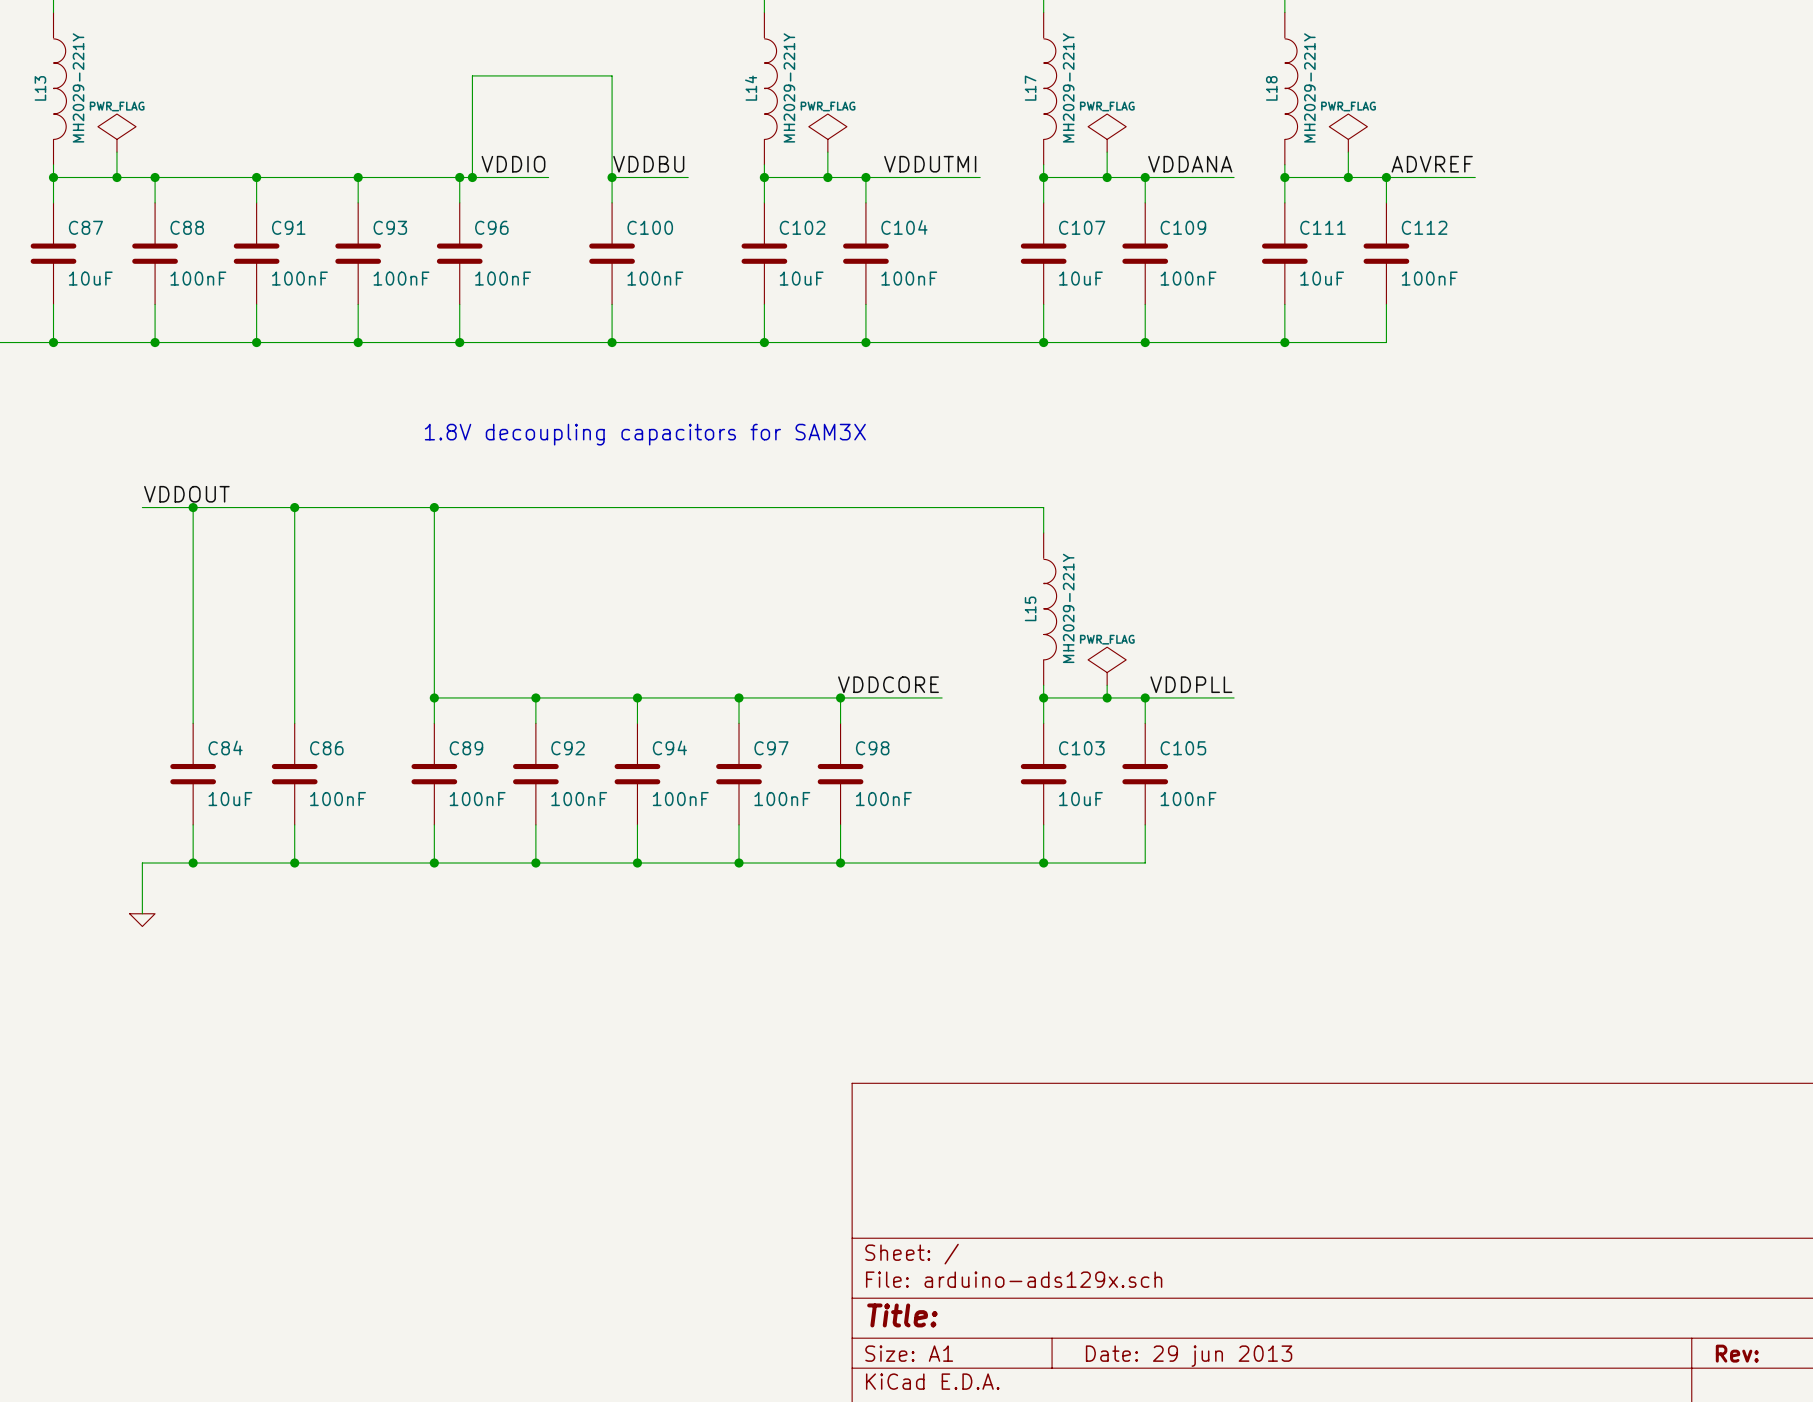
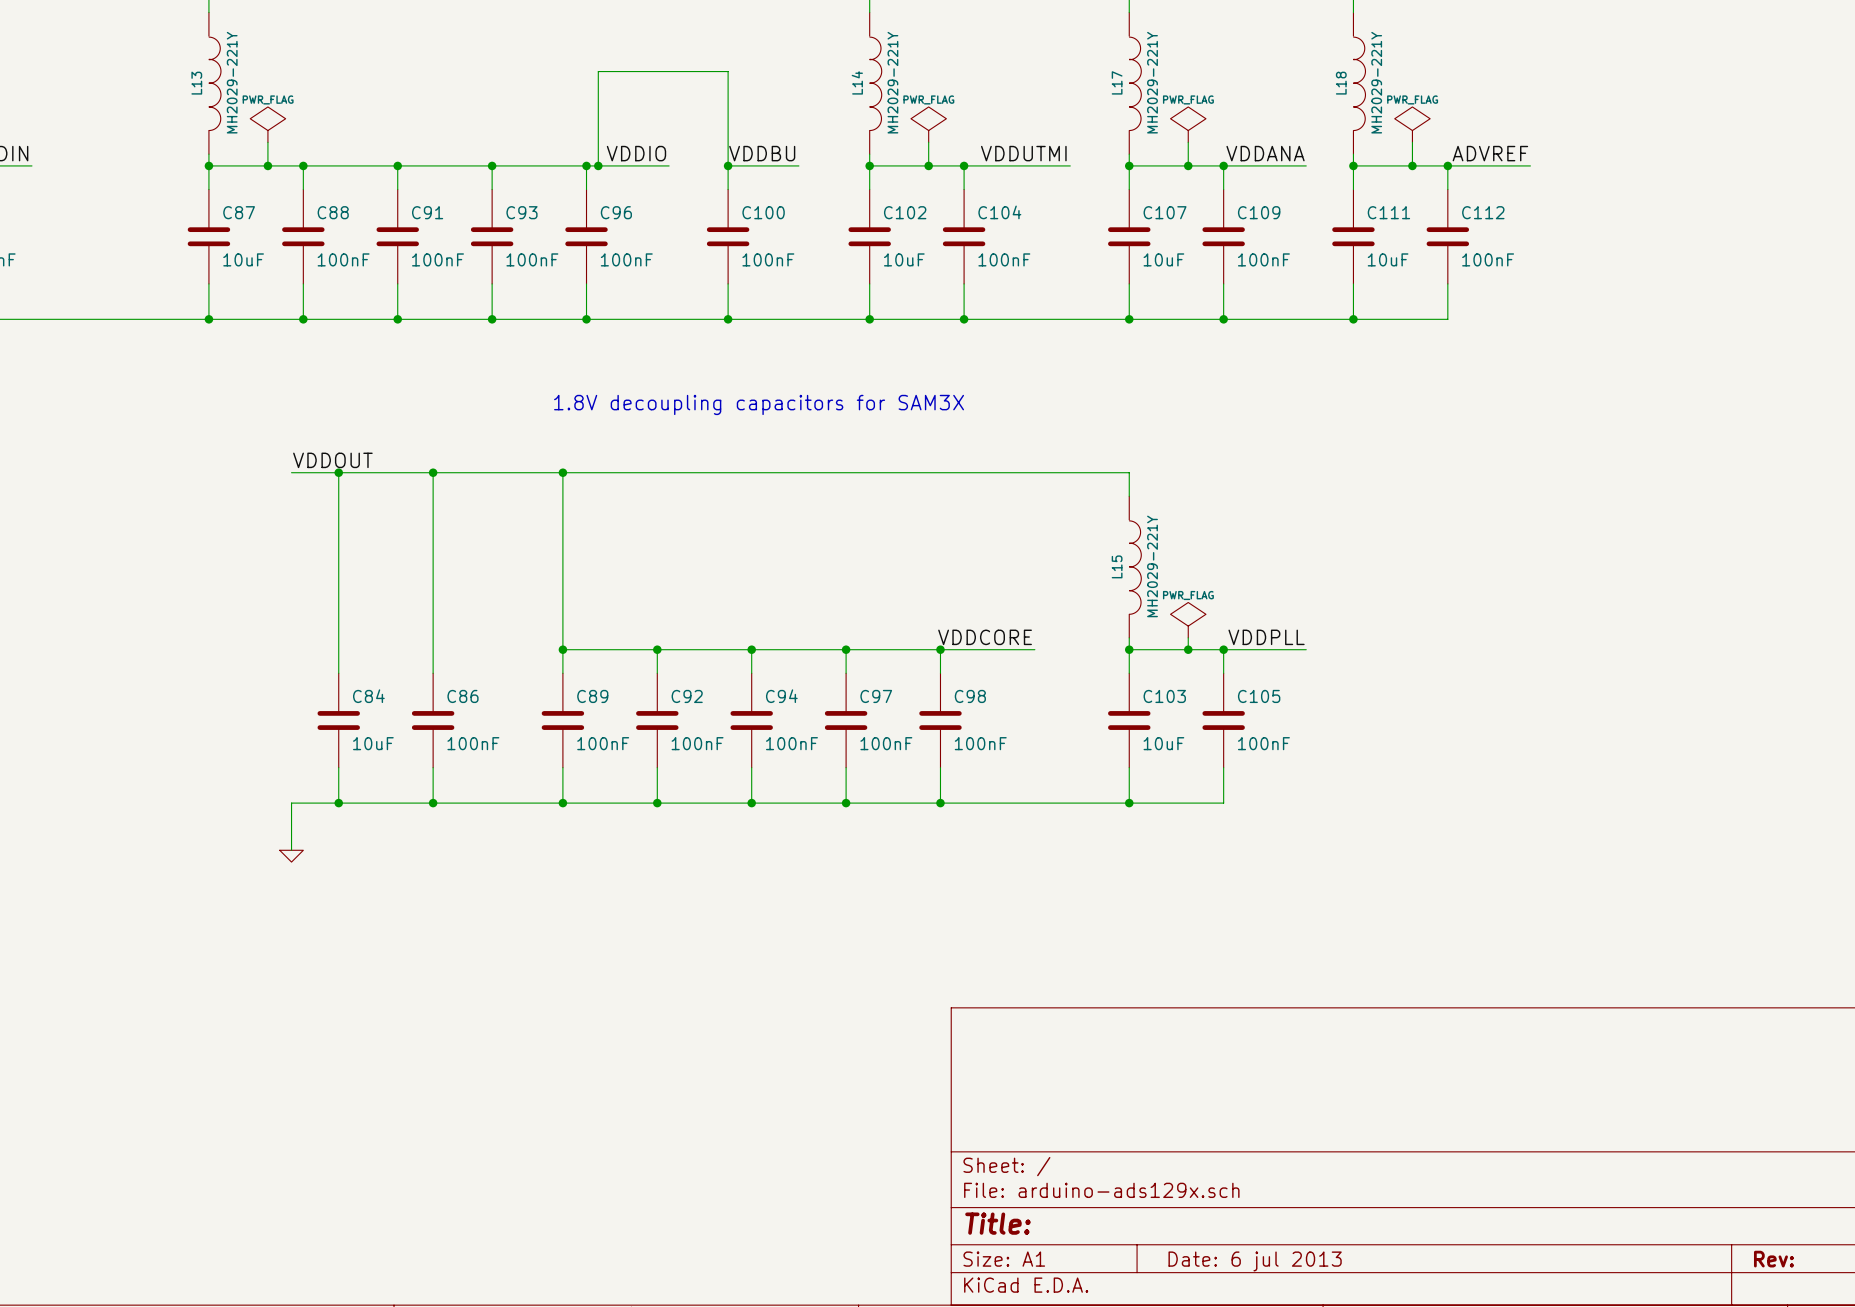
title block: Date: 29 jun 2013 (1189, 1356) -> Date: 6 jul 2013 (1255, 1261)

